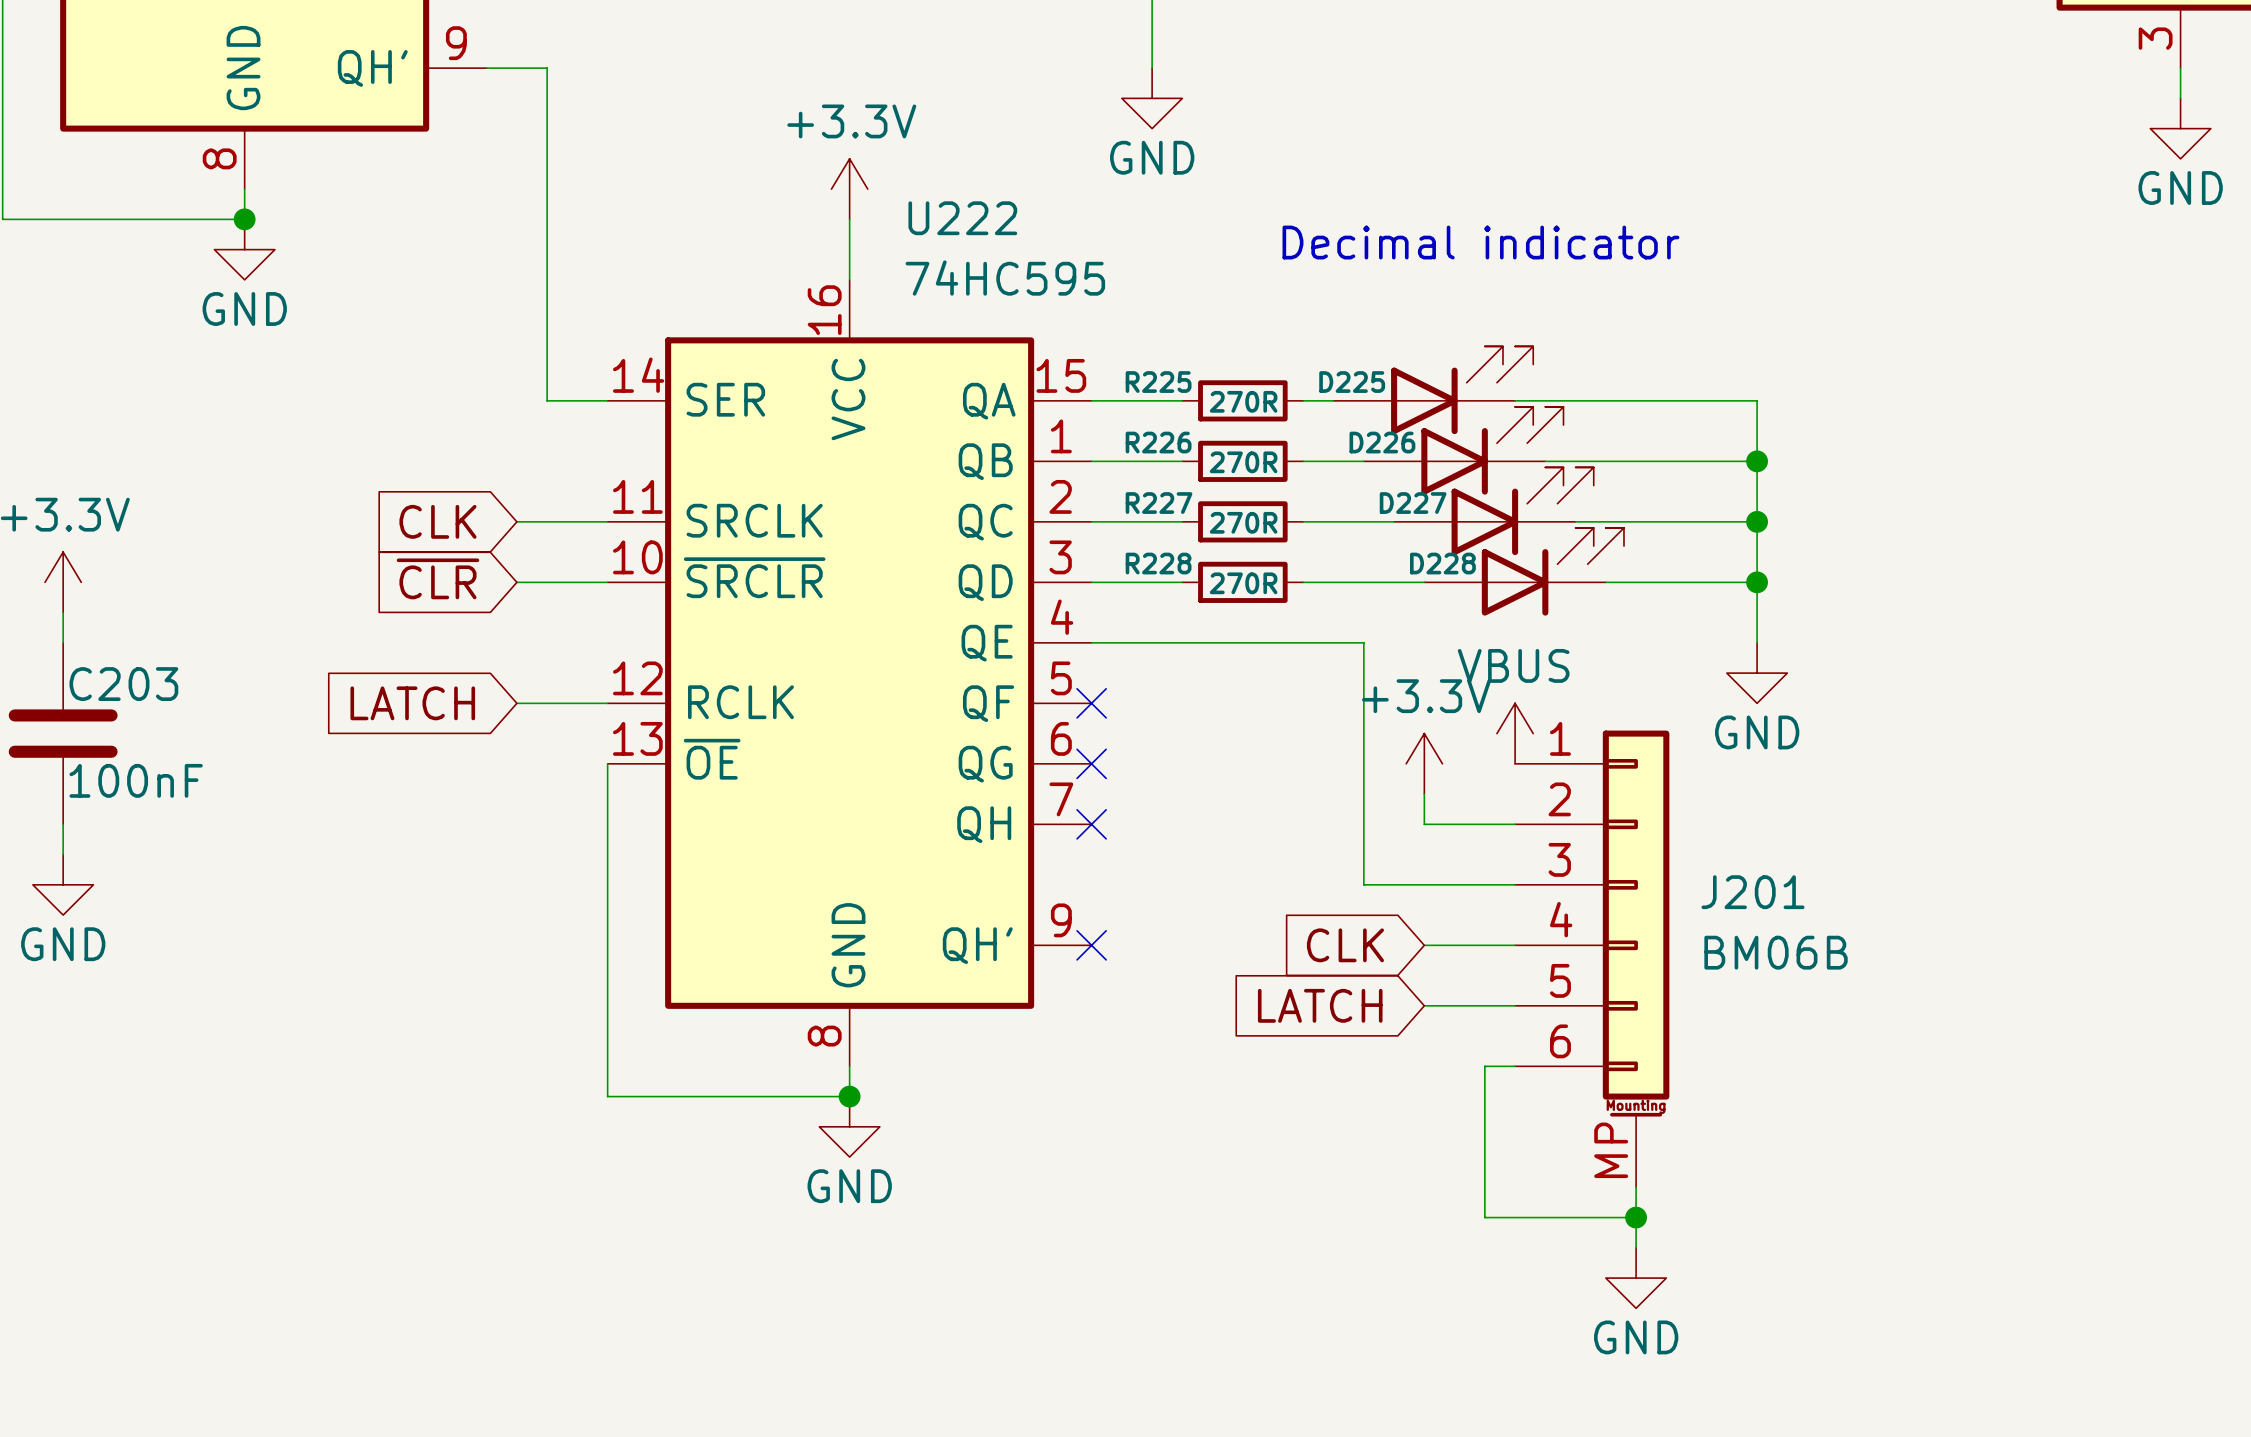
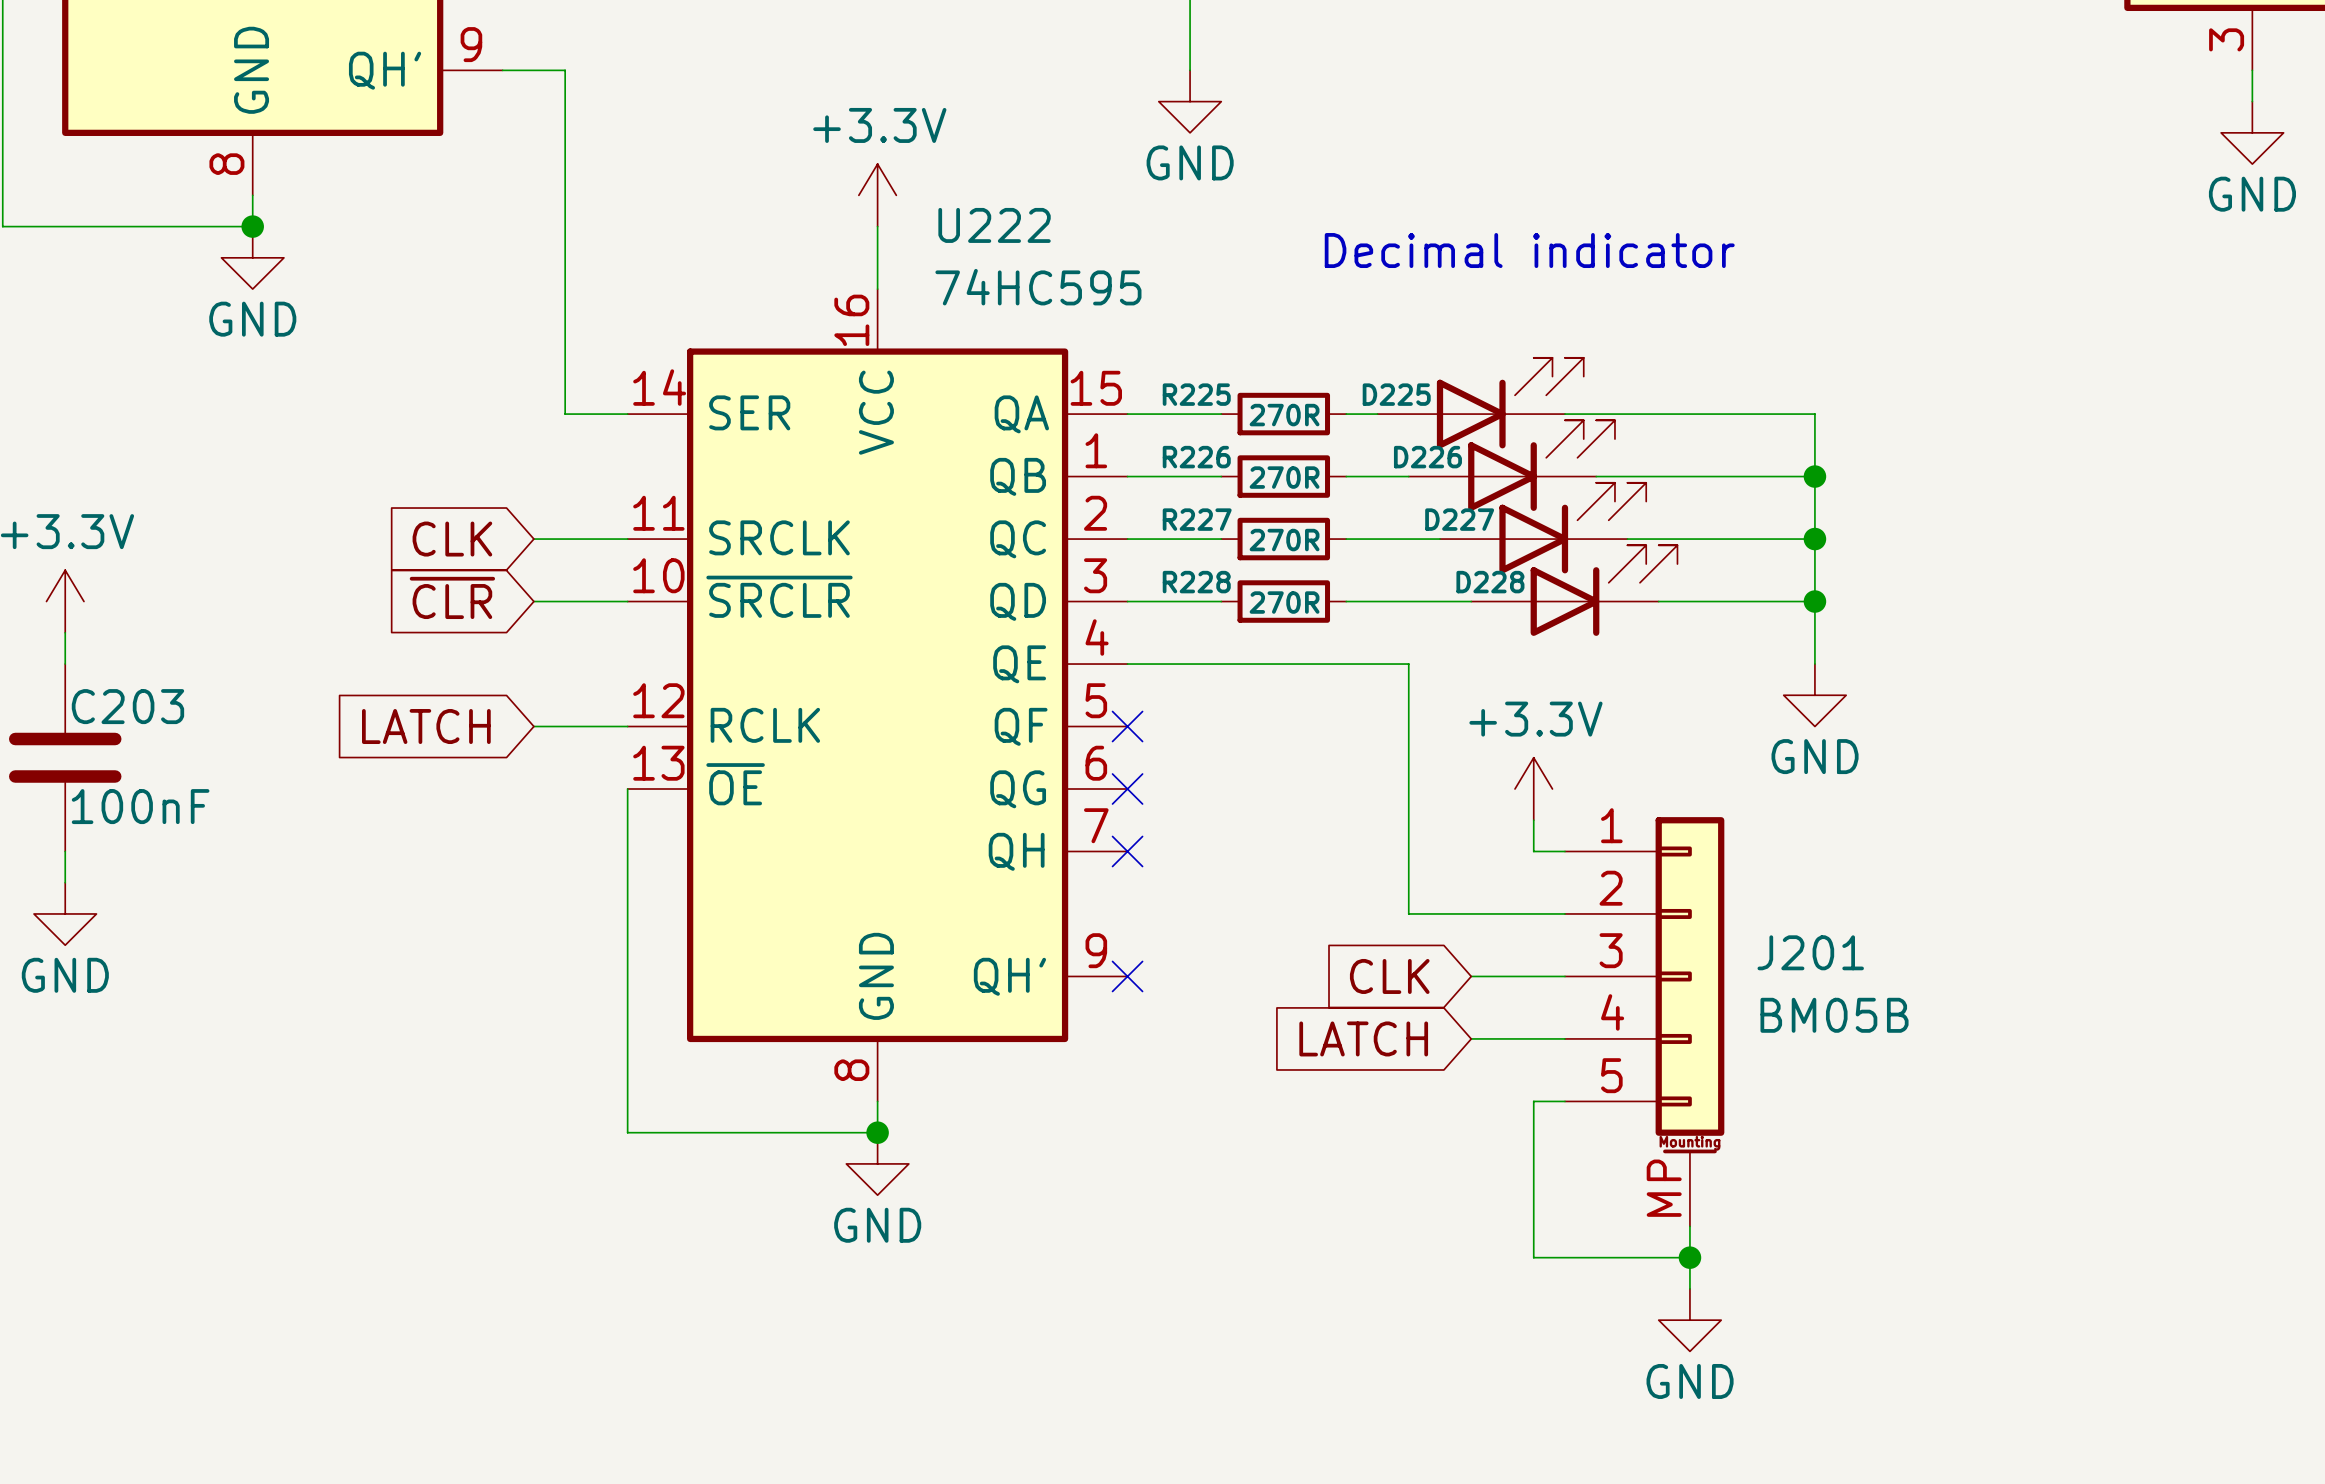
J201 symbol: [1515, 730, 1670, 1188] -> [1564, 817, 1725, 1227]
power symbol: VBUS (1515, 733) -> none
power symbol position: +3.3V (1424, 763) -> +3.3V (1533, 789)
wire: (1424, 794) (1424, 824) (1484, 824) -> (1533, 820) (1533, 851)
J201 value: BM06B (1776, 952) -> BM05B (1834, 1015)

